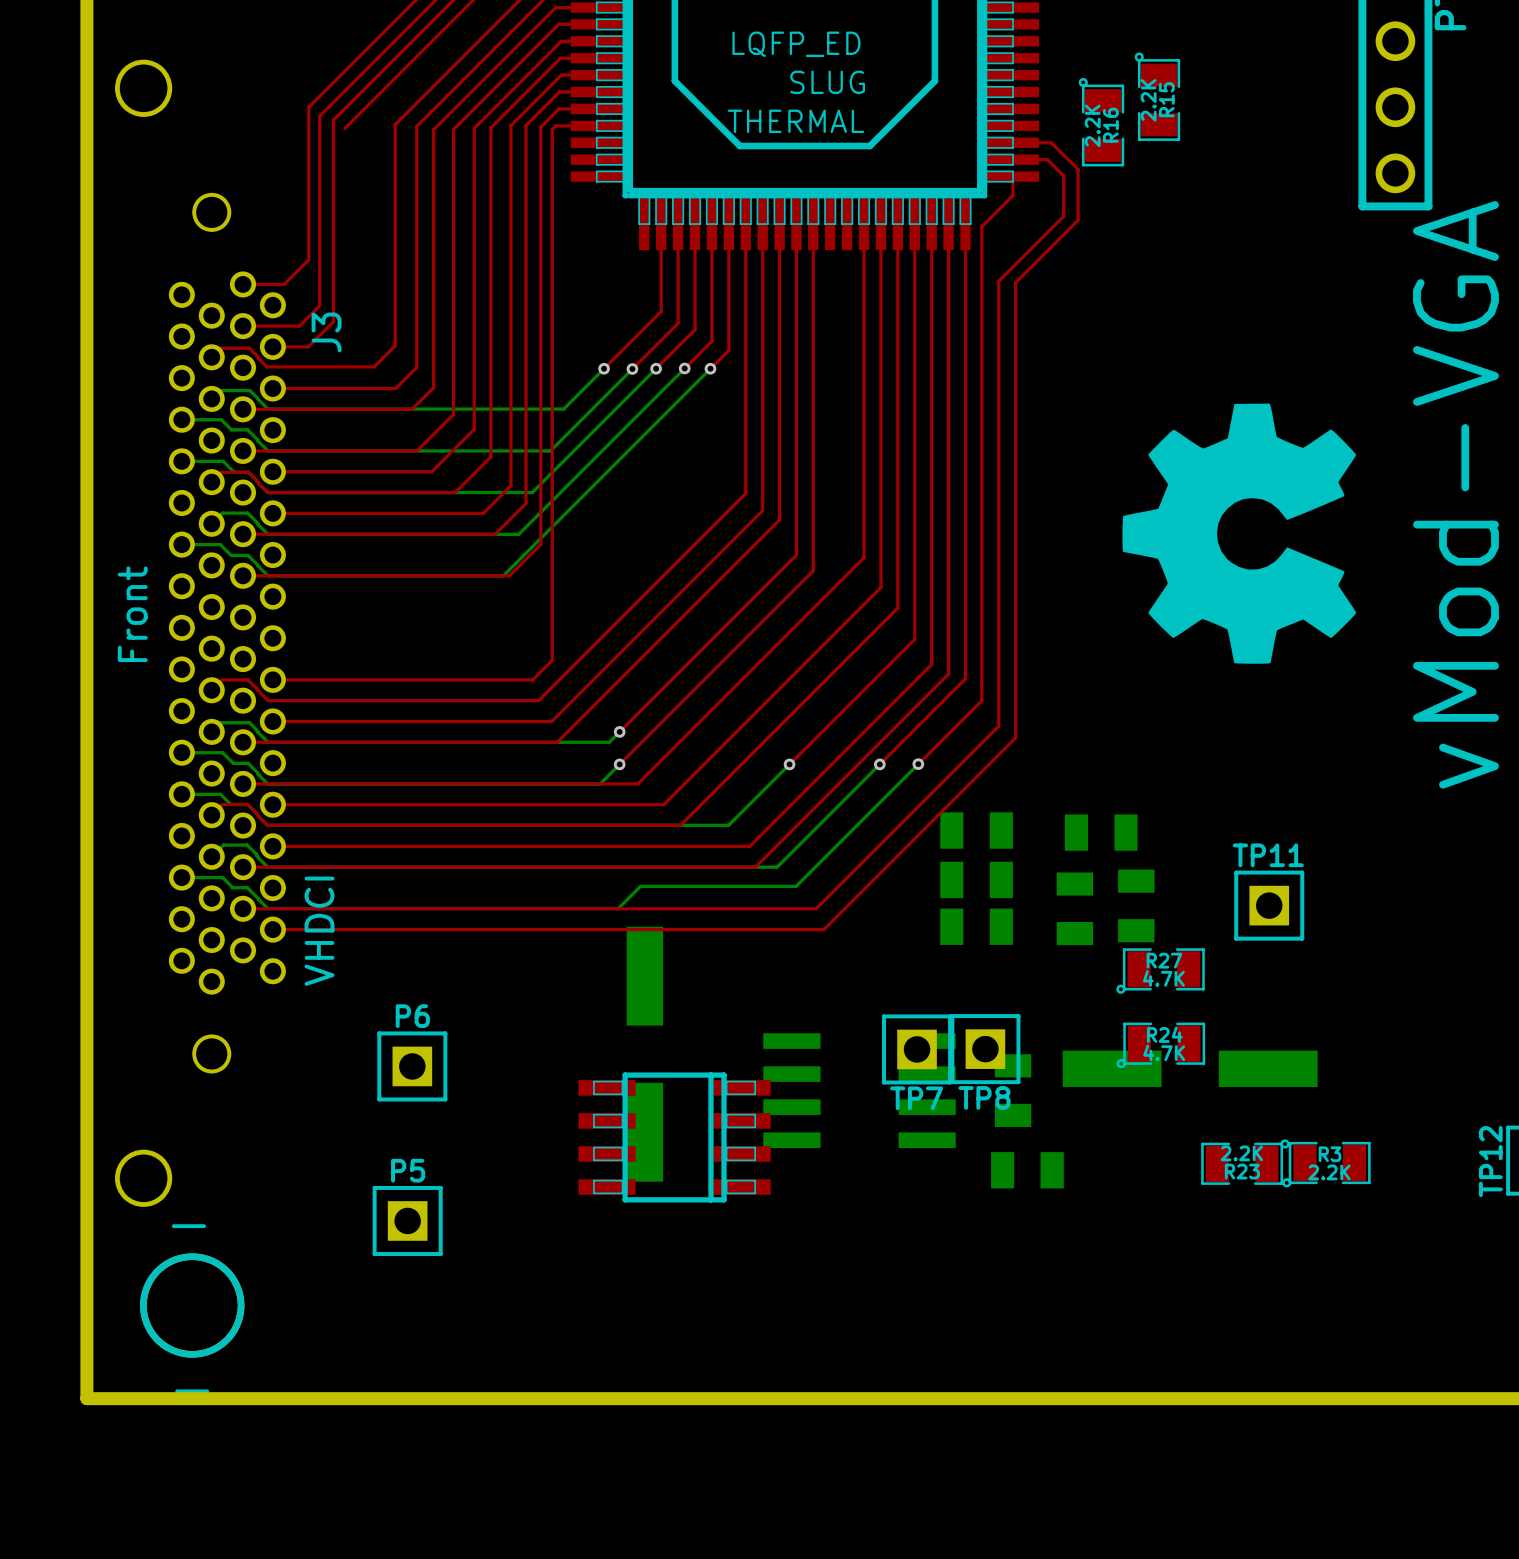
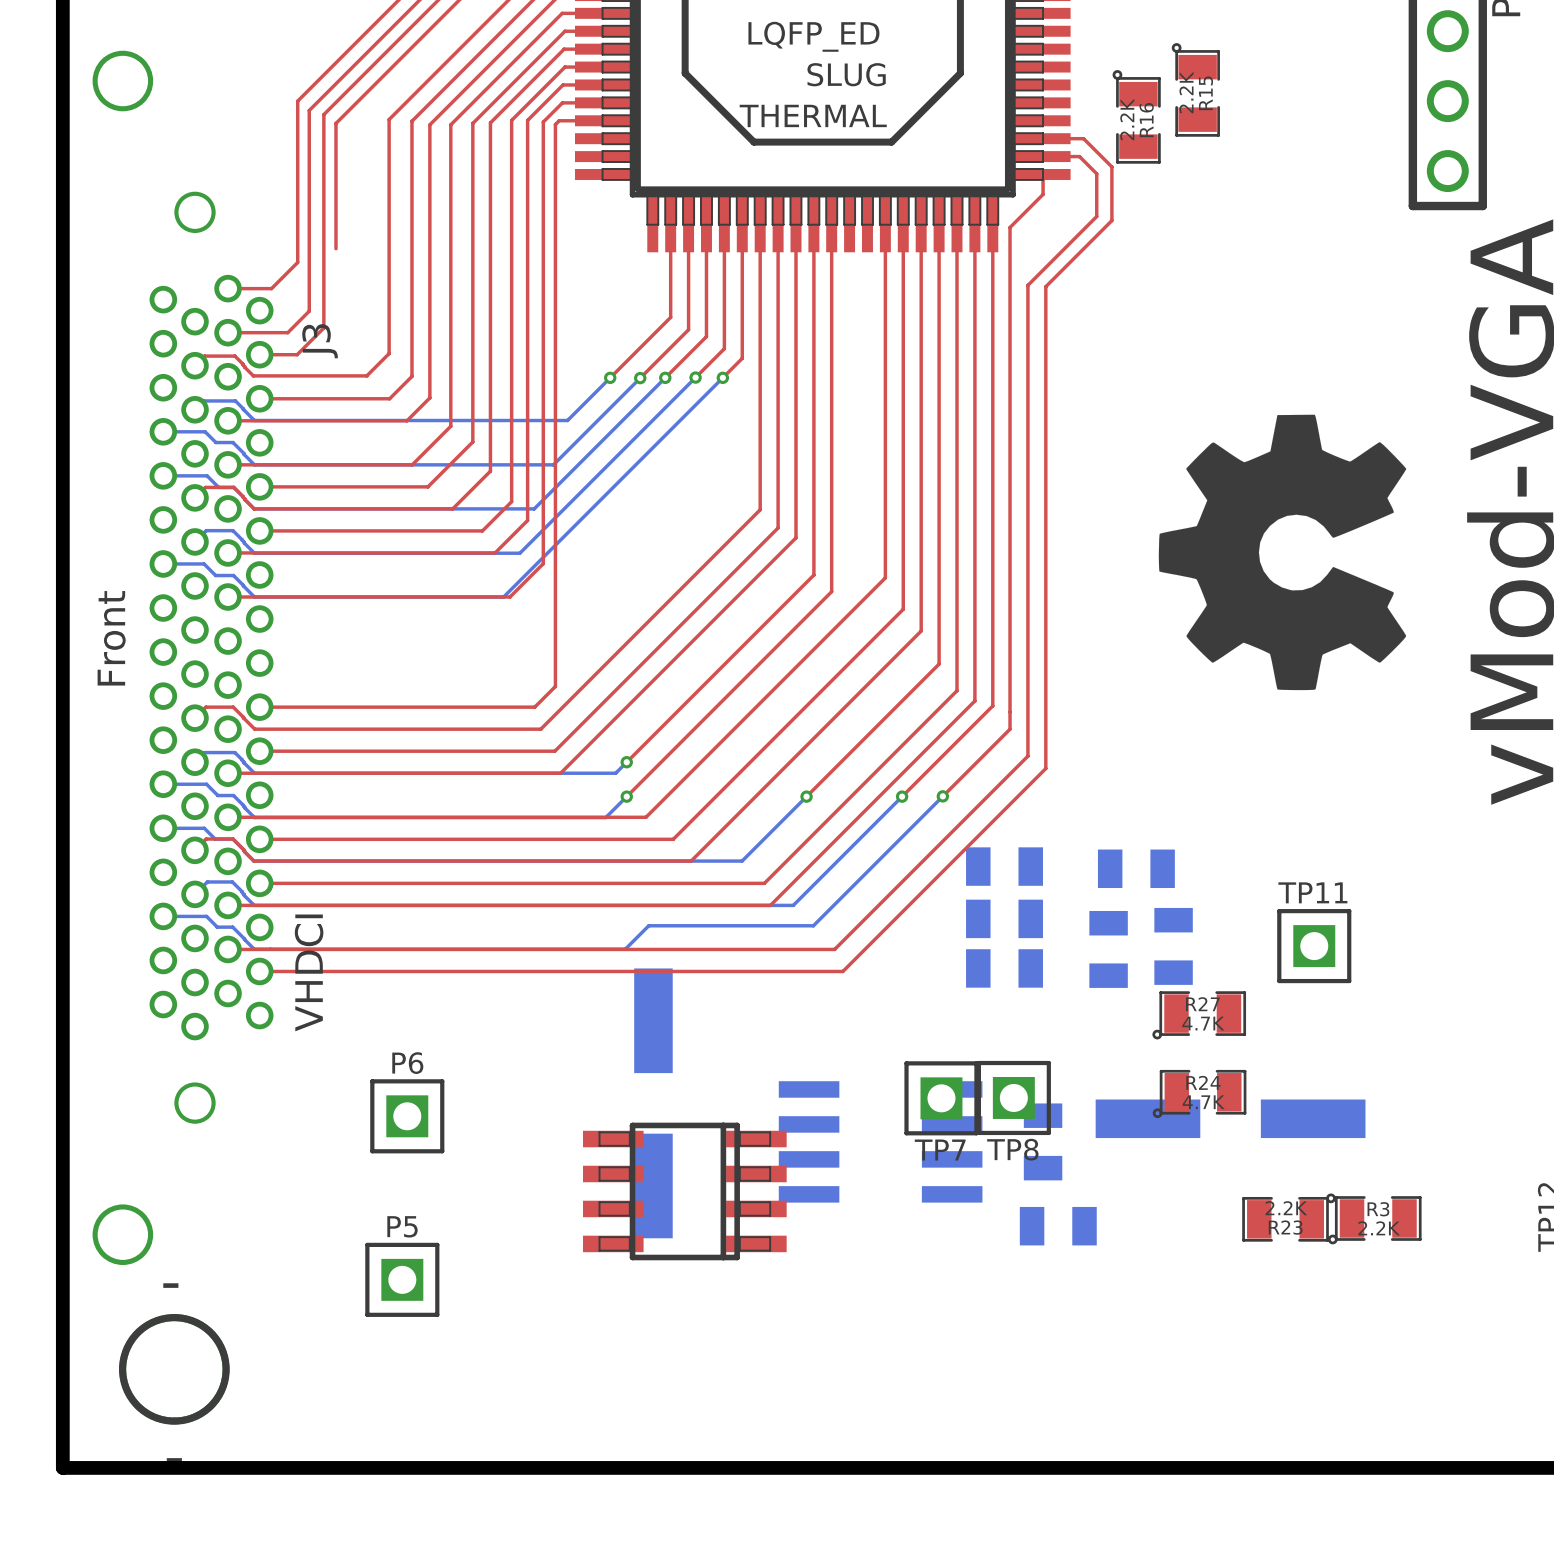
top track: none -> (335, 123) (335, 248)

